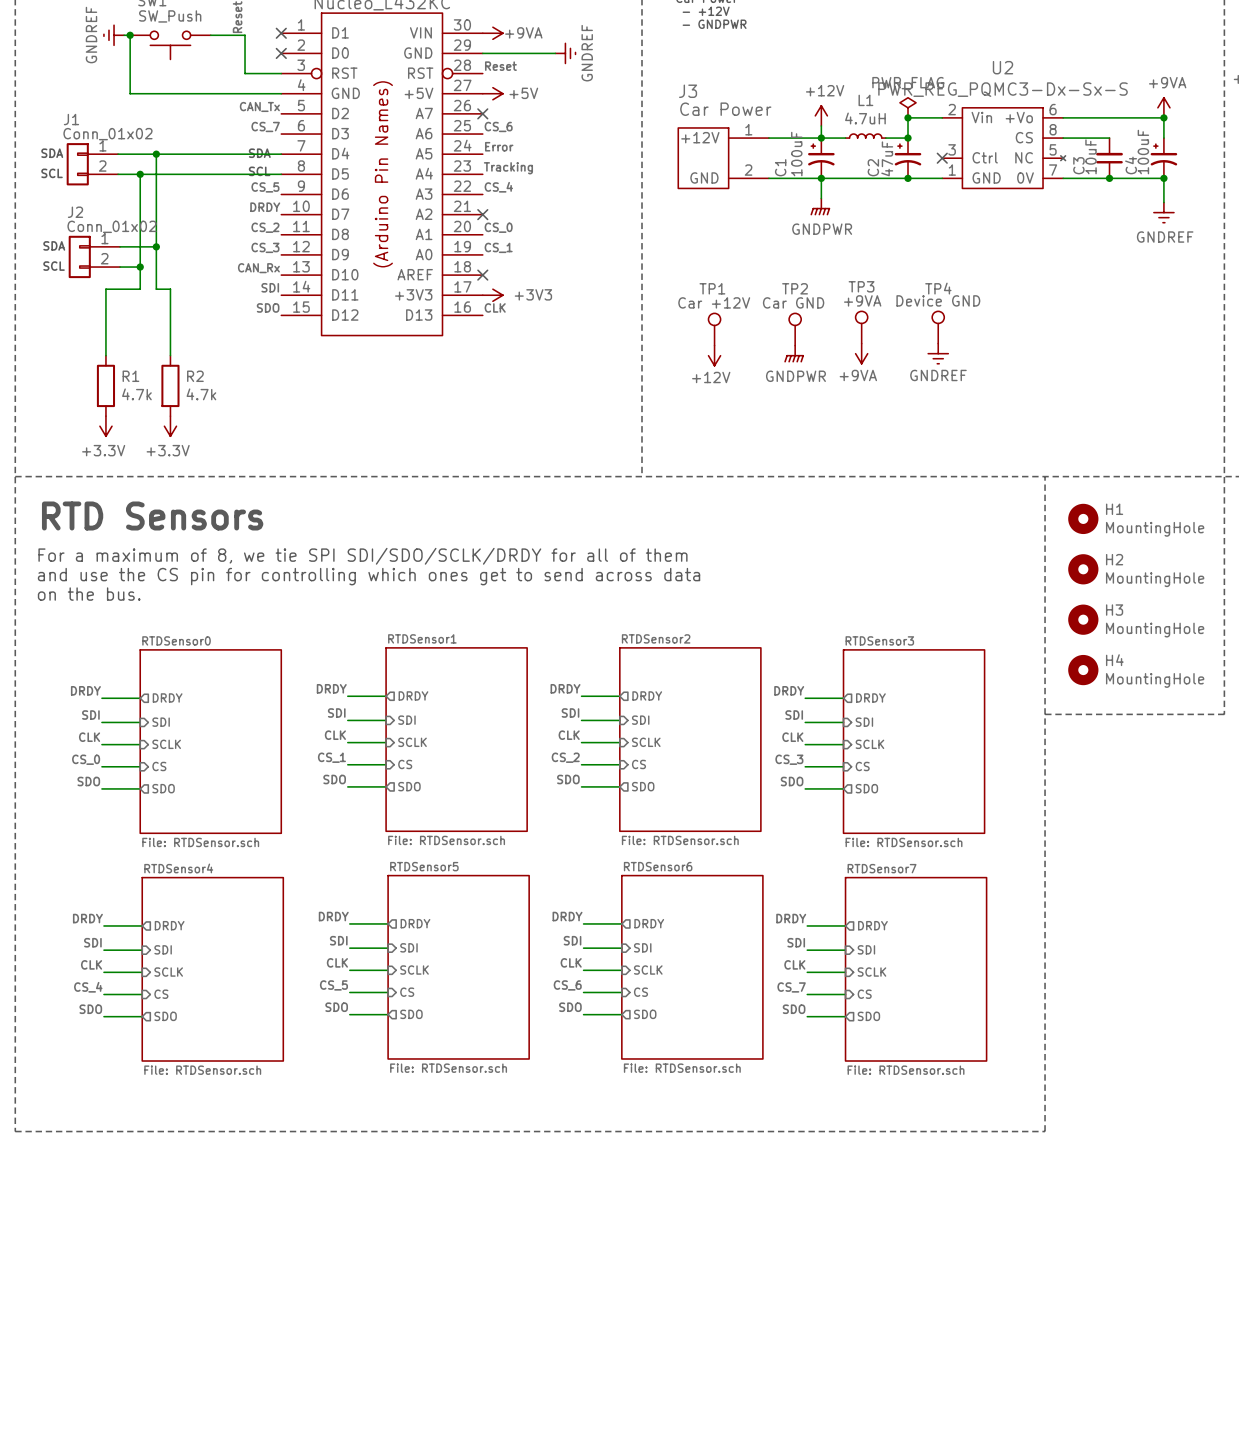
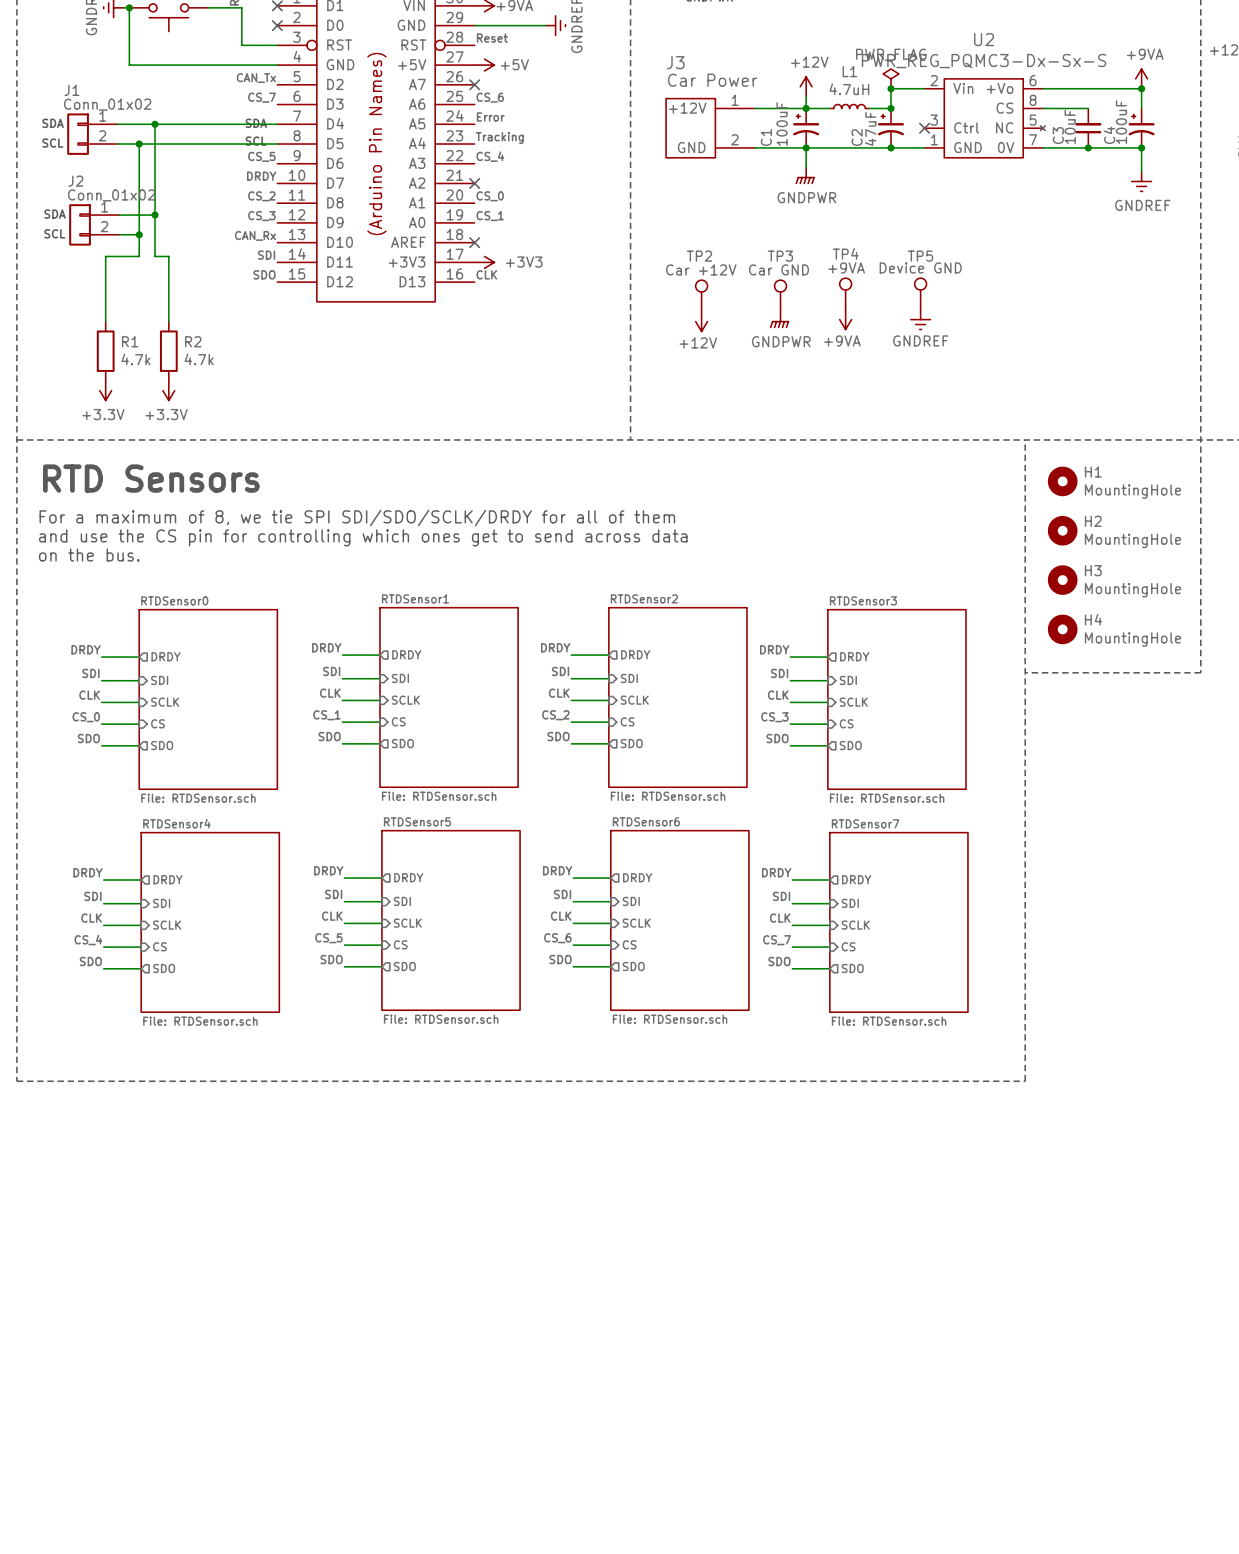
TP3 name: TP3 (861, 286) -> TP4 (845, 253)
TP1 name: TP1 (712, 288) -> TP2 (699, 256)
TP2 name: TP2 (795, 288) -> TP3 (780, 256)
TP4 name: TP4 (938, 288) -> TP5 (920, 256)

